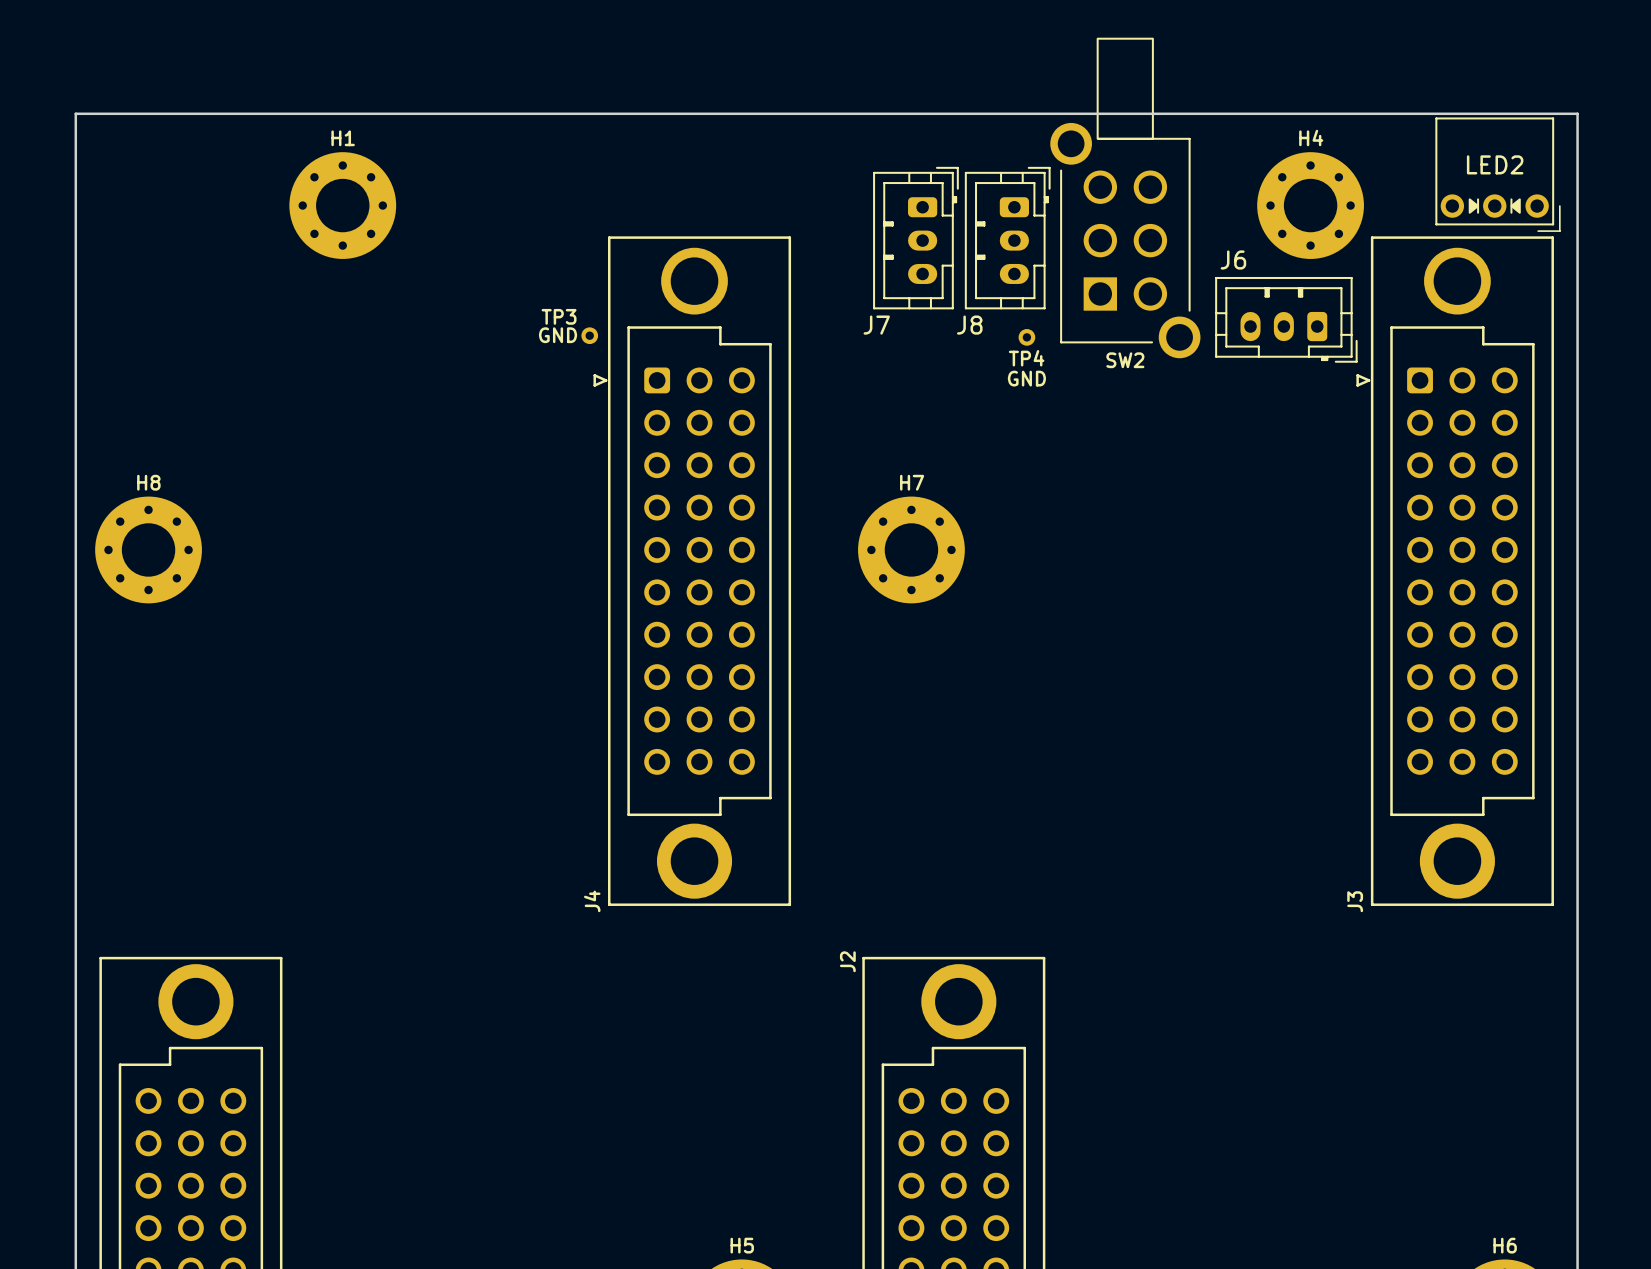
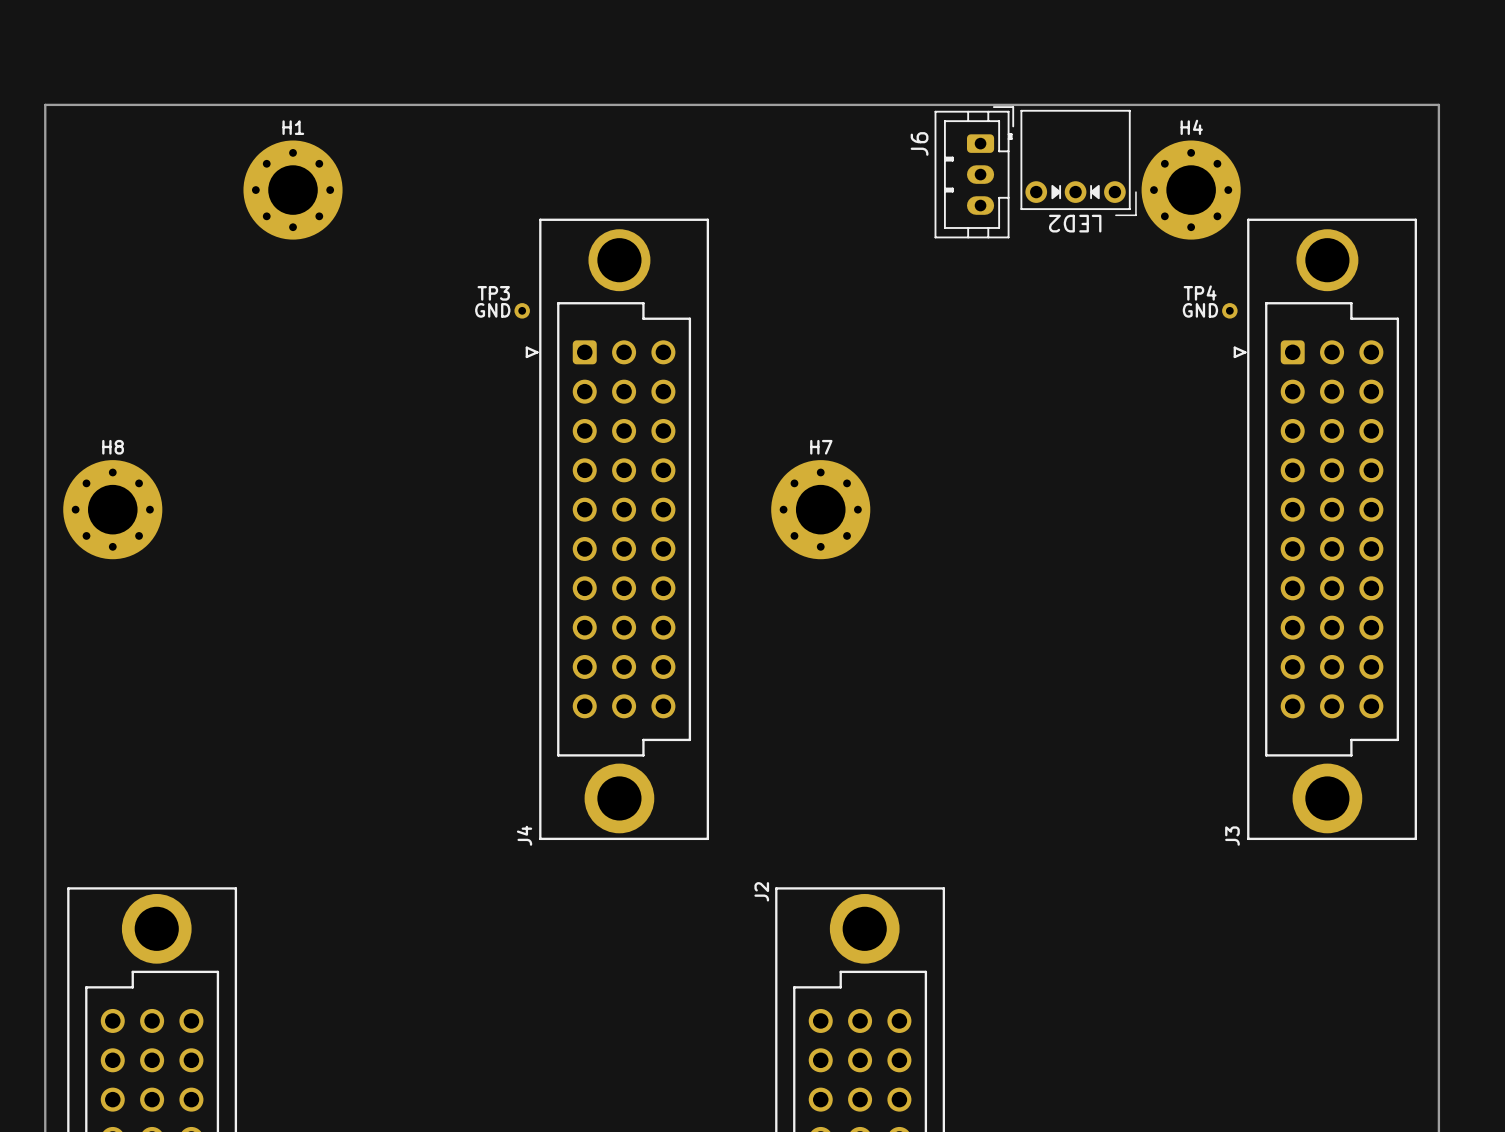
LED2 name rotation: 0° (1495, 164) -> 180° (1075, 223)
LED2 name position: LED2 (1495, 164) -> LED2 (1075, 223)
LED2 position: (1498, 174) -> (1078, 162)
SW2: (1125, 197) -> none
J7: (915, 238) -> none
J8: (1007, 238) -> none
J6 rotation: 0° (1286, 319) -> 90° counterclockwise (974, 172)
J6 position: (1286, 319) -> (974, 172)
TP4 position: (1026, 337) -> (1229, 310)
TP4 name position: TP4 (1026, 358) -> TP4 (1200, 293)
TP4 value position: GND (1026, 378) -> GND (1200, 310)

